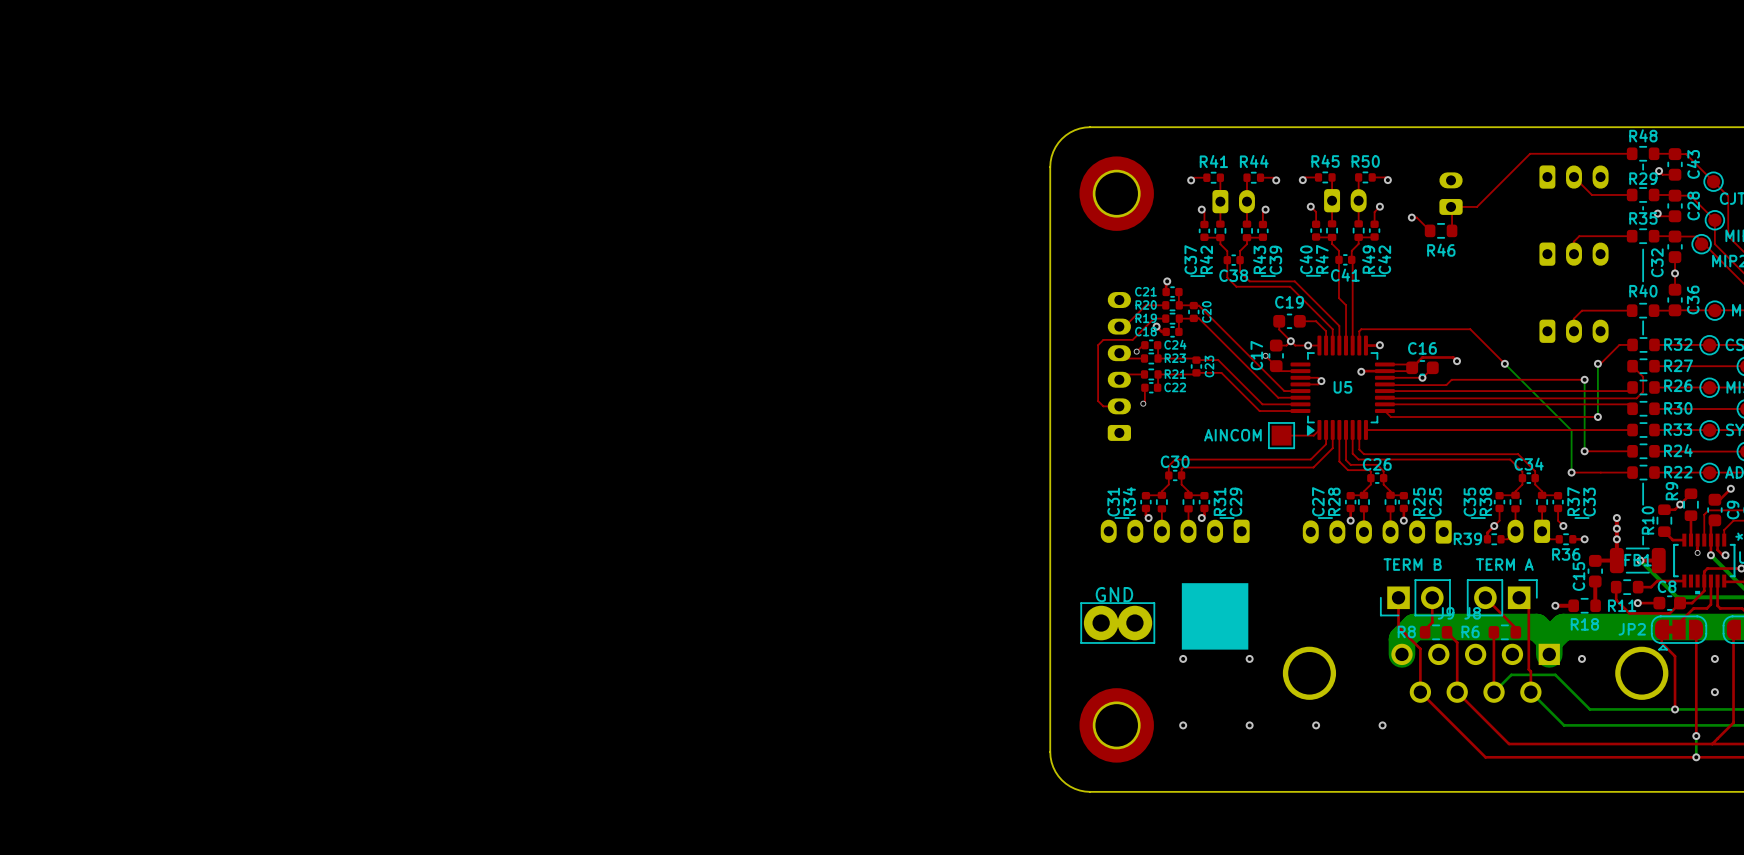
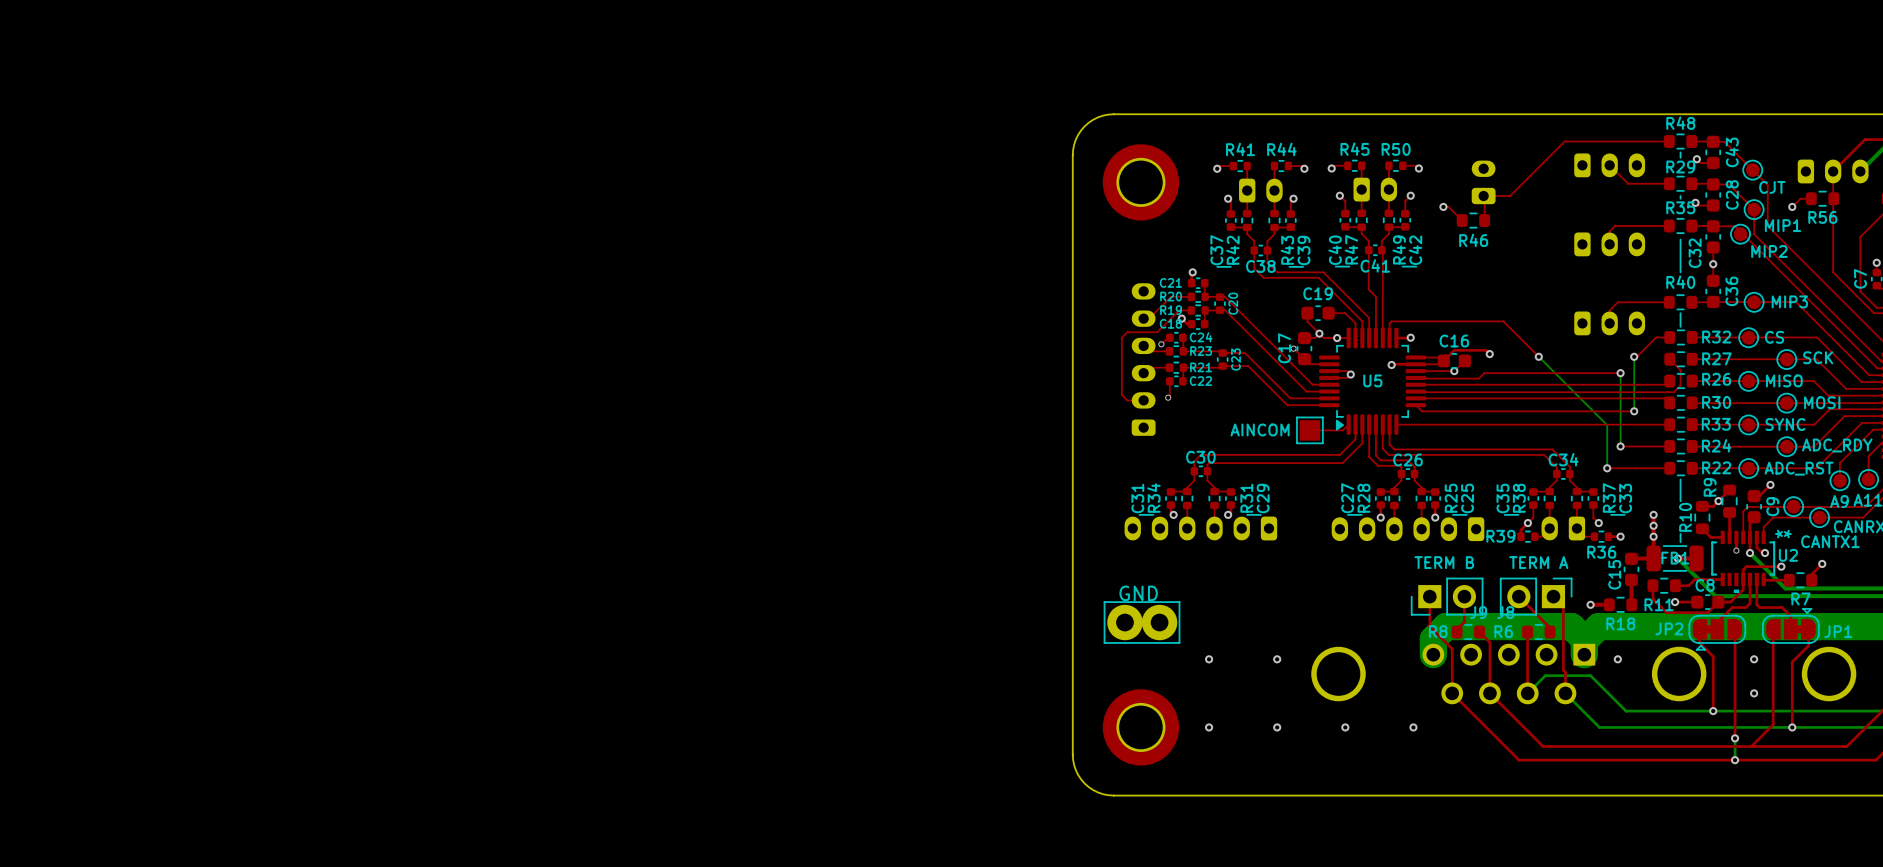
drawing: [1181, 583, 1249, 650] -> none

